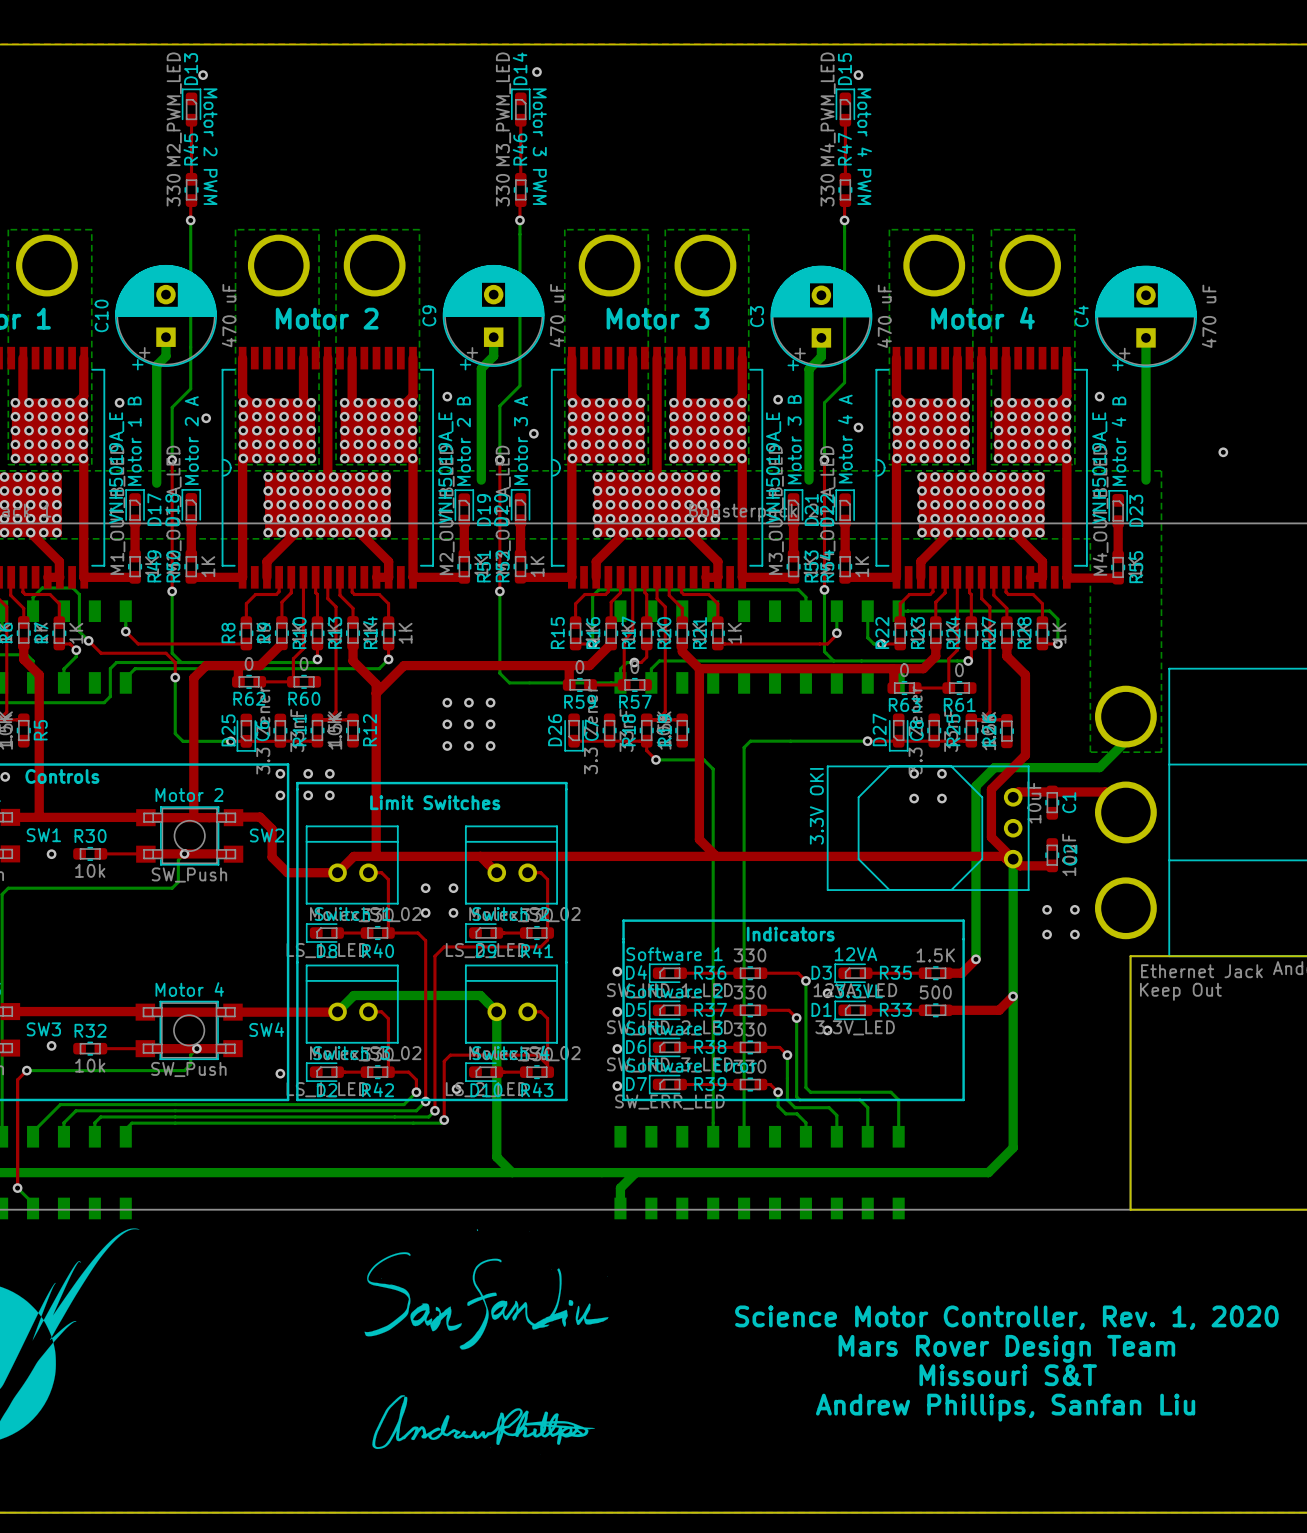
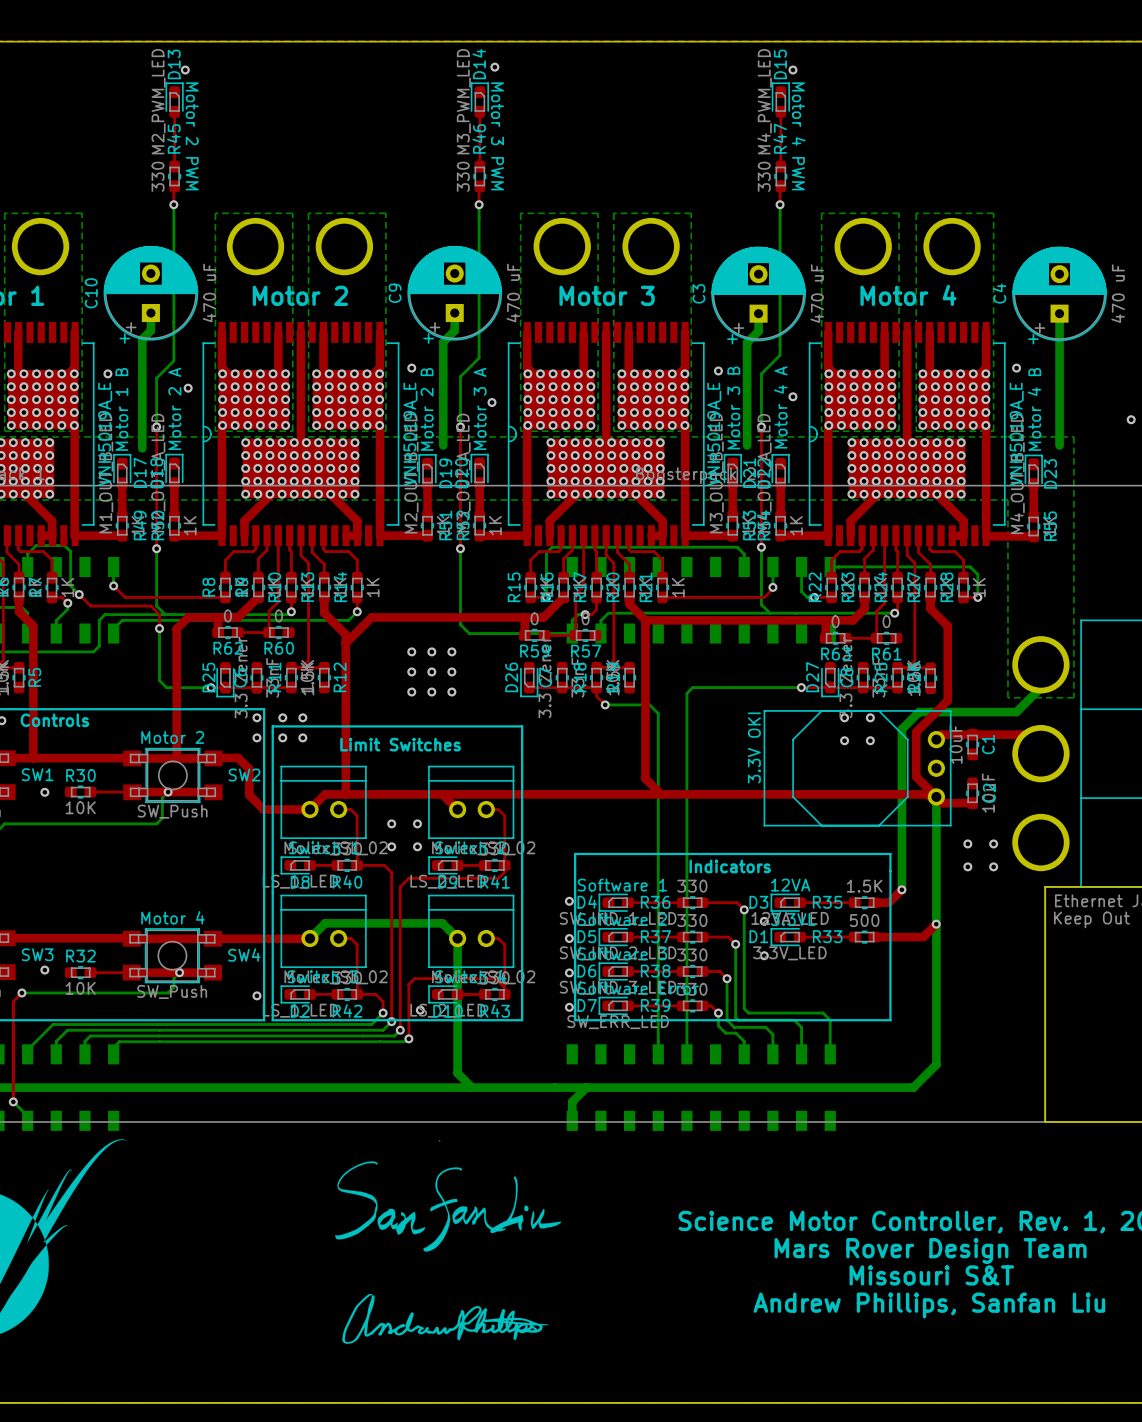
R30 value: 10k (90, 870) -> 10K (80, 807)
R32 value: 10k (90, 1065) -> 10K (80, 988)

